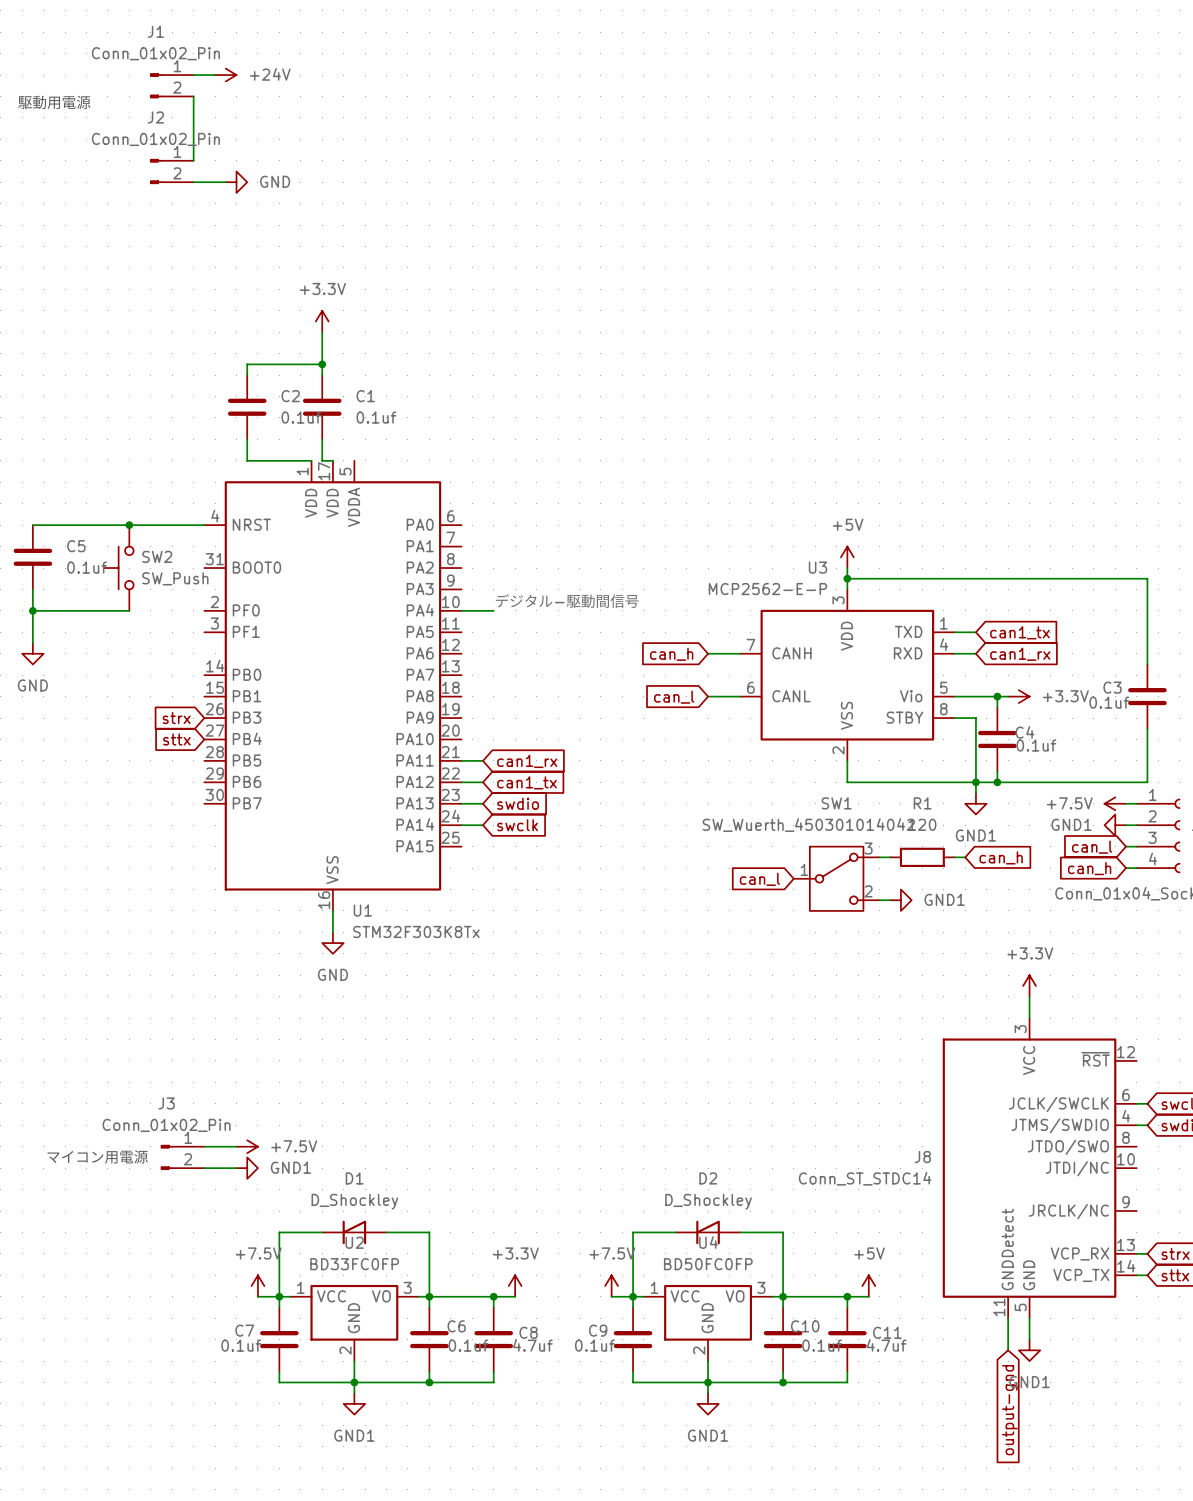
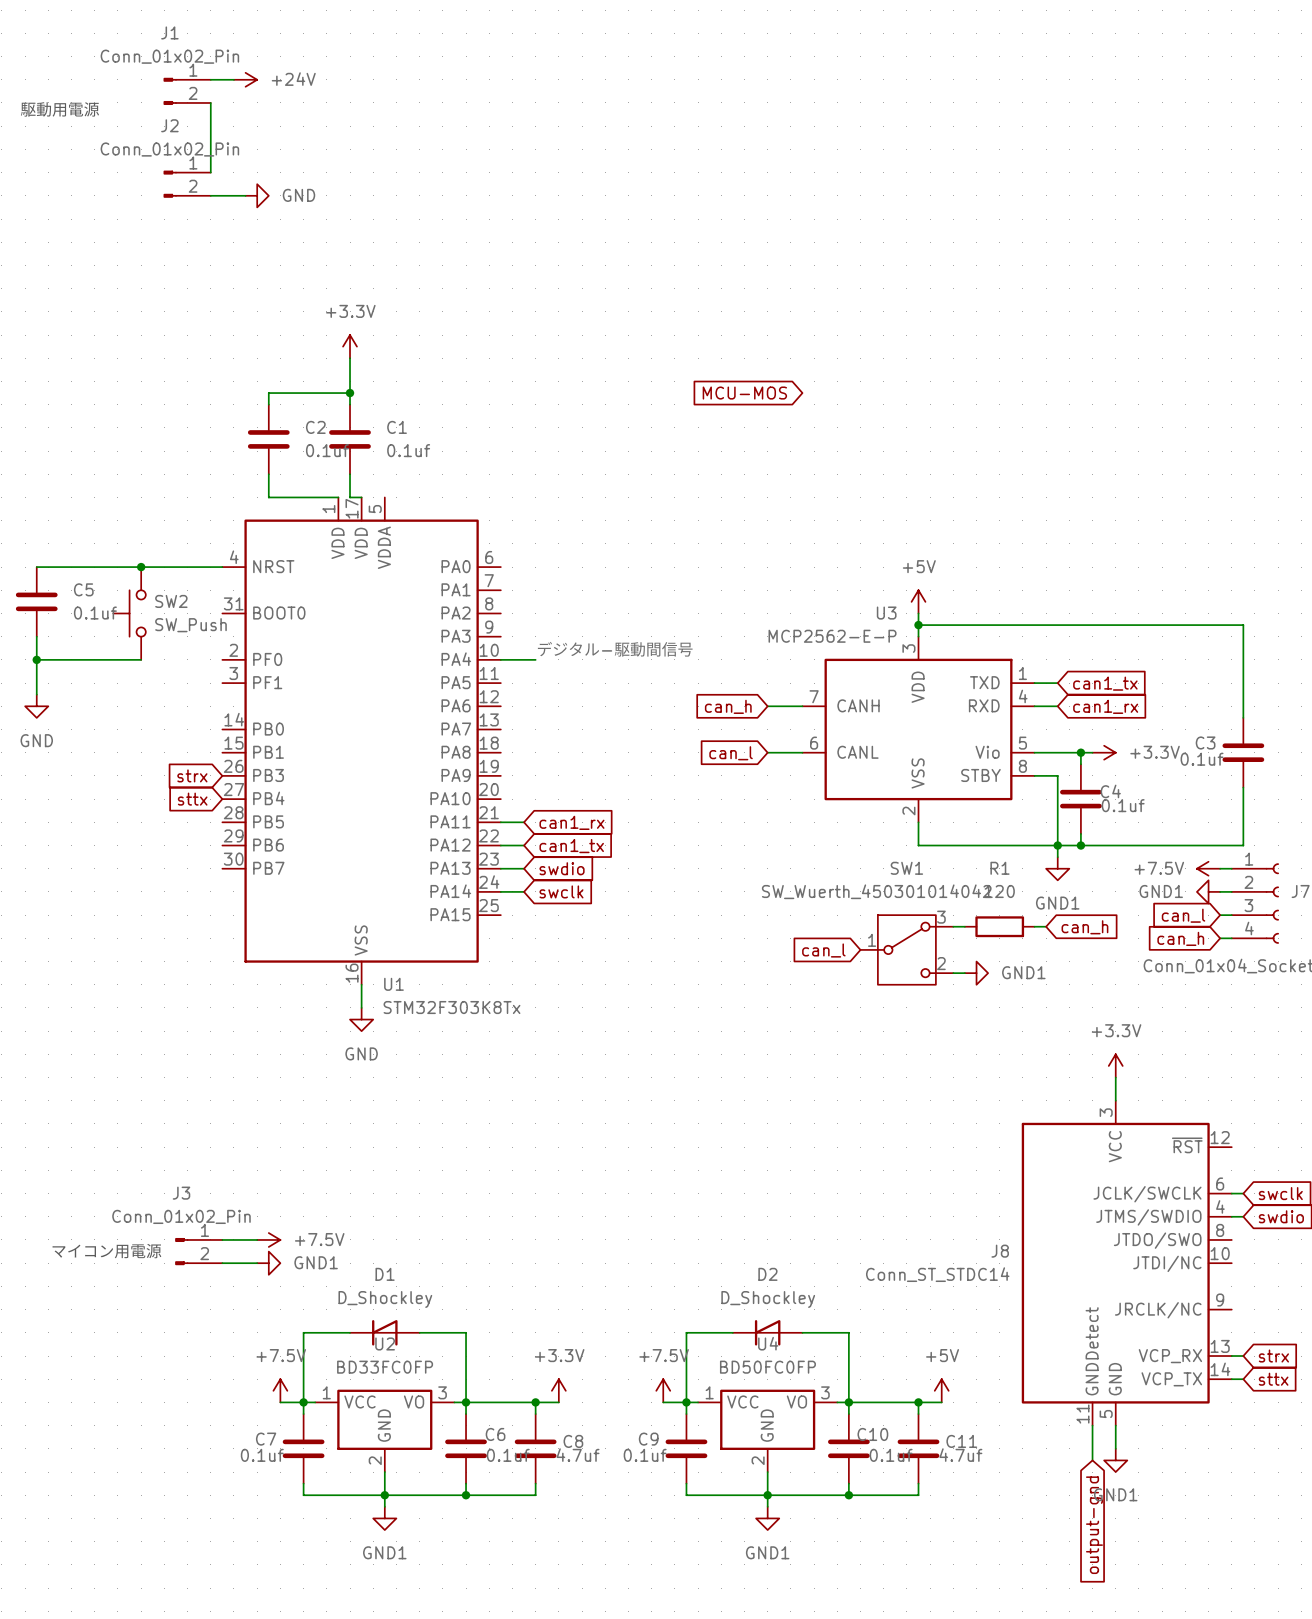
global label: none -> MCU-MOS (744, 393)

